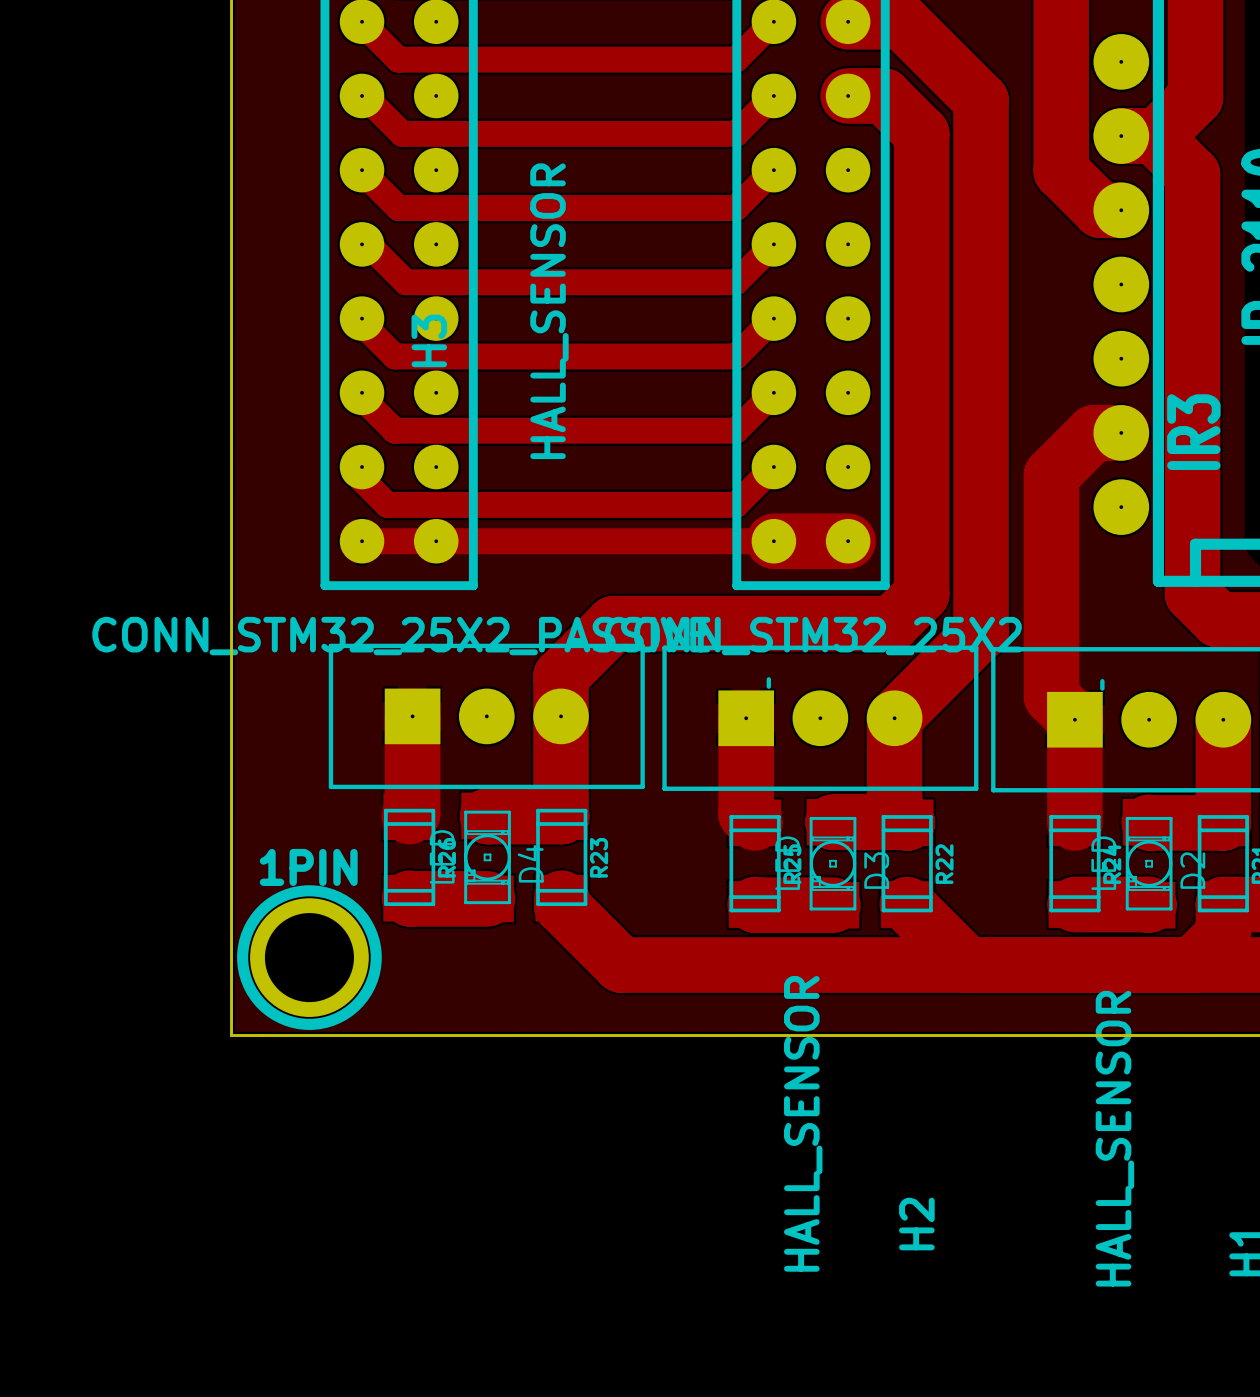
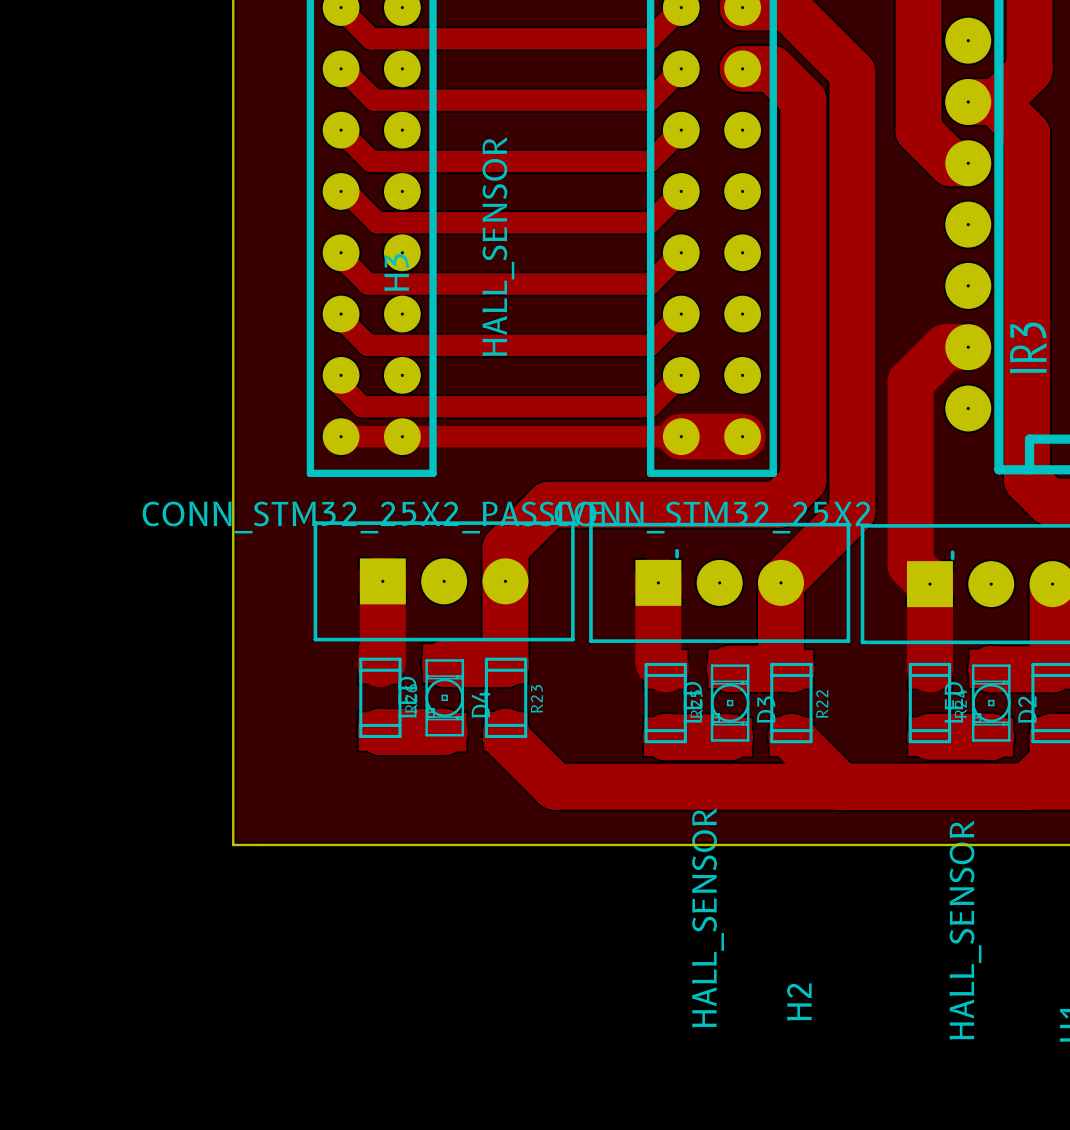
1PIN: (309, 957) -> none

